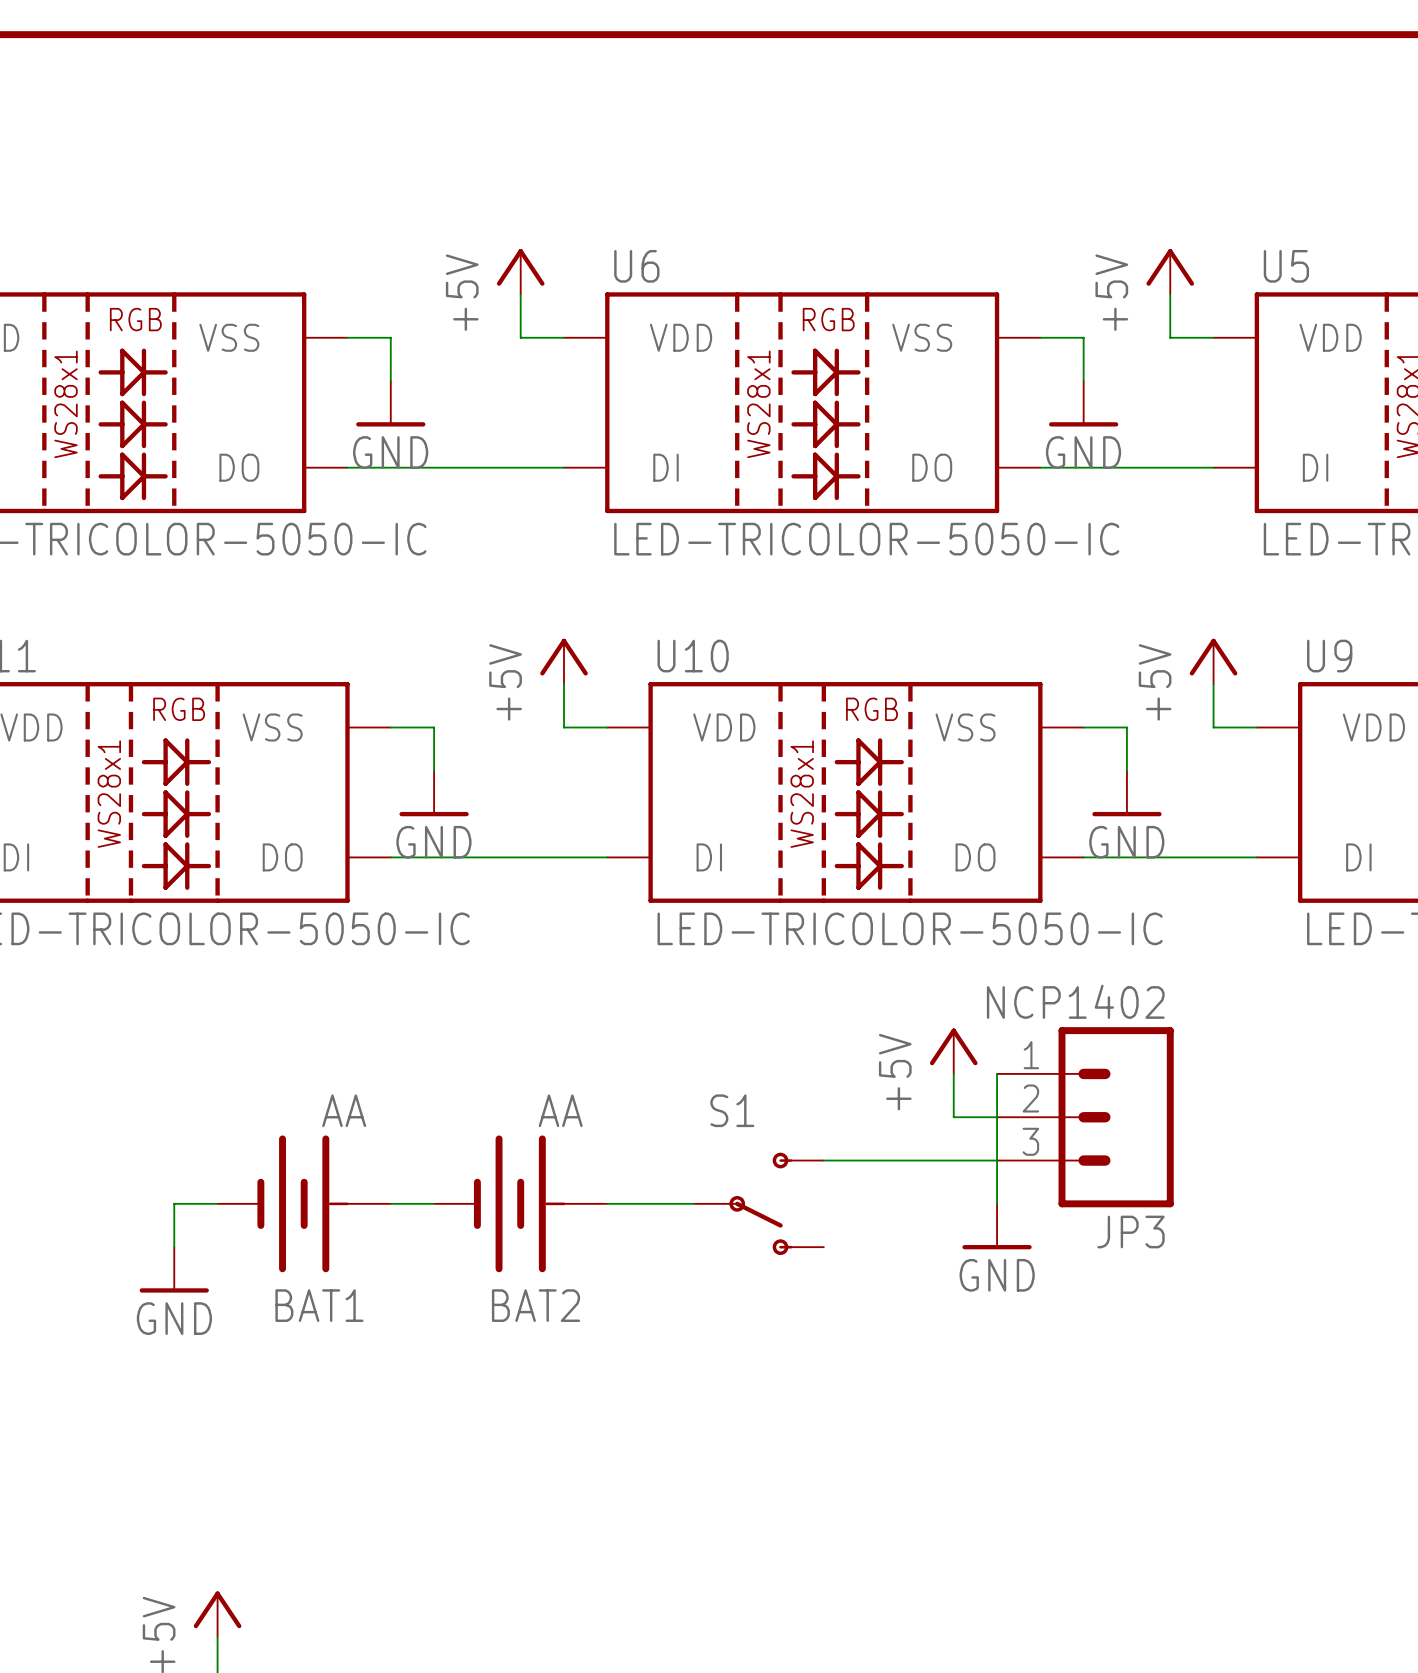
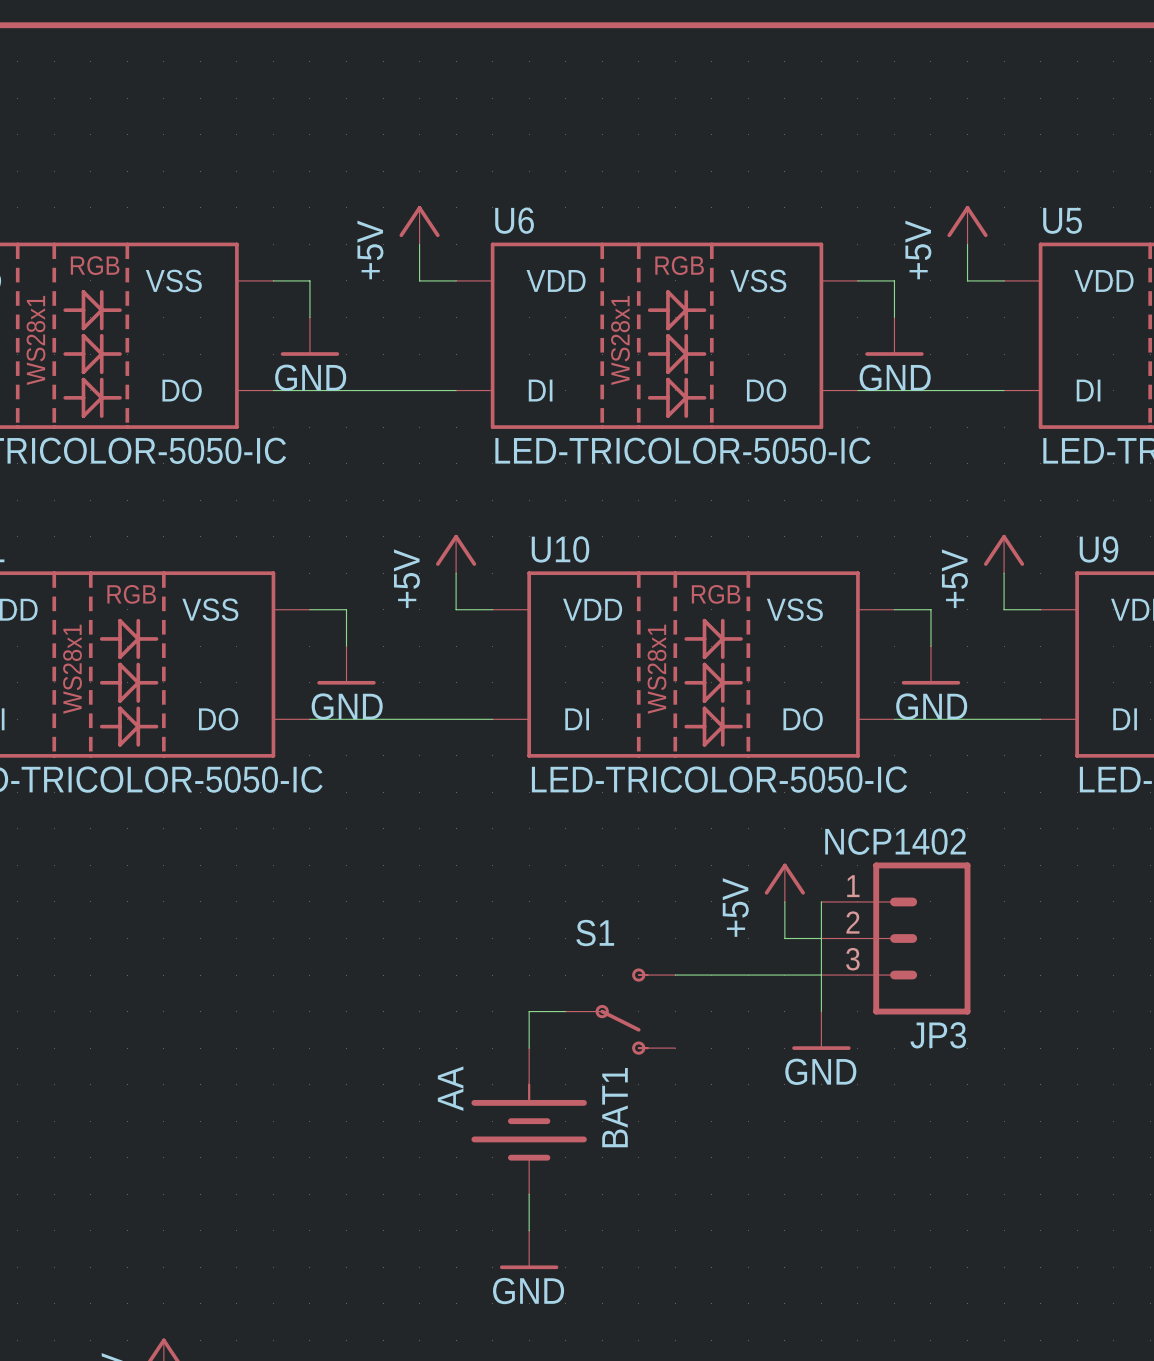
wire: (217, 1203) (174, 1203) (174, 1247) -> none
BAT1 rotation: 0° (303, 1203) -> 90° counterclockwise (529, 1122)
BAT1 position: (304, 1203) -> (529, 1121)
wire: (390, 1203) (434, 1203) -> none
BAT2: AA (520, 1203) -> none
wire: (607, 1203) (650, 1203) -> (529, 1048) (529, 1011)
power symbol: GND (174, 1269) -> none
wire: none -> (529, 1194) (529, 1230)
power symbol: none -> GND (529, 1249)

